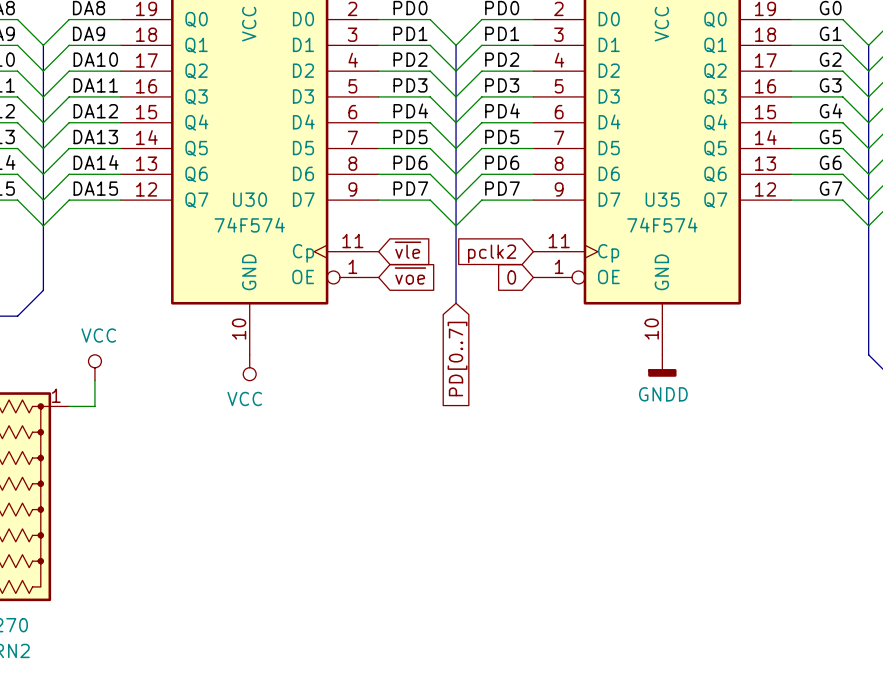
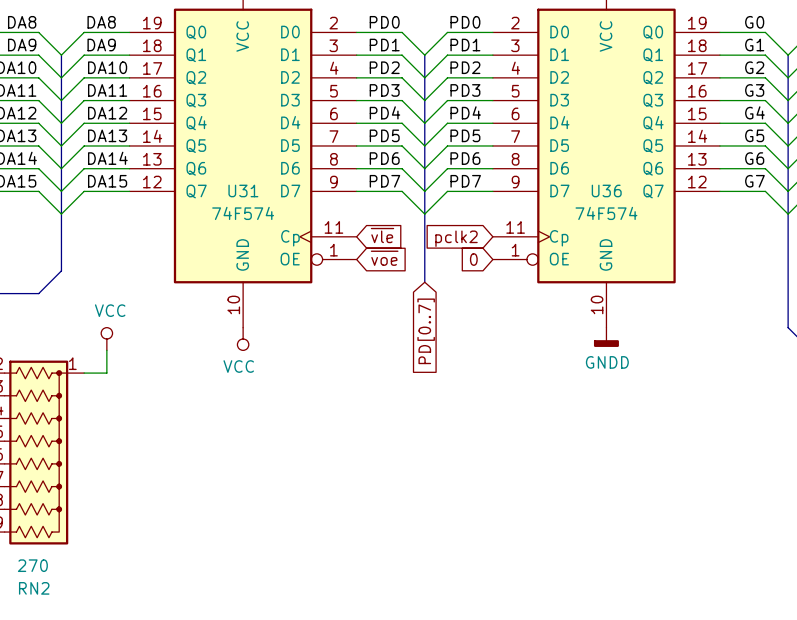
U30 name: U30 (250, 199) -> U31 (243, 190)
U35 name: U35 (662, 199) -> U36 (606, 190)

